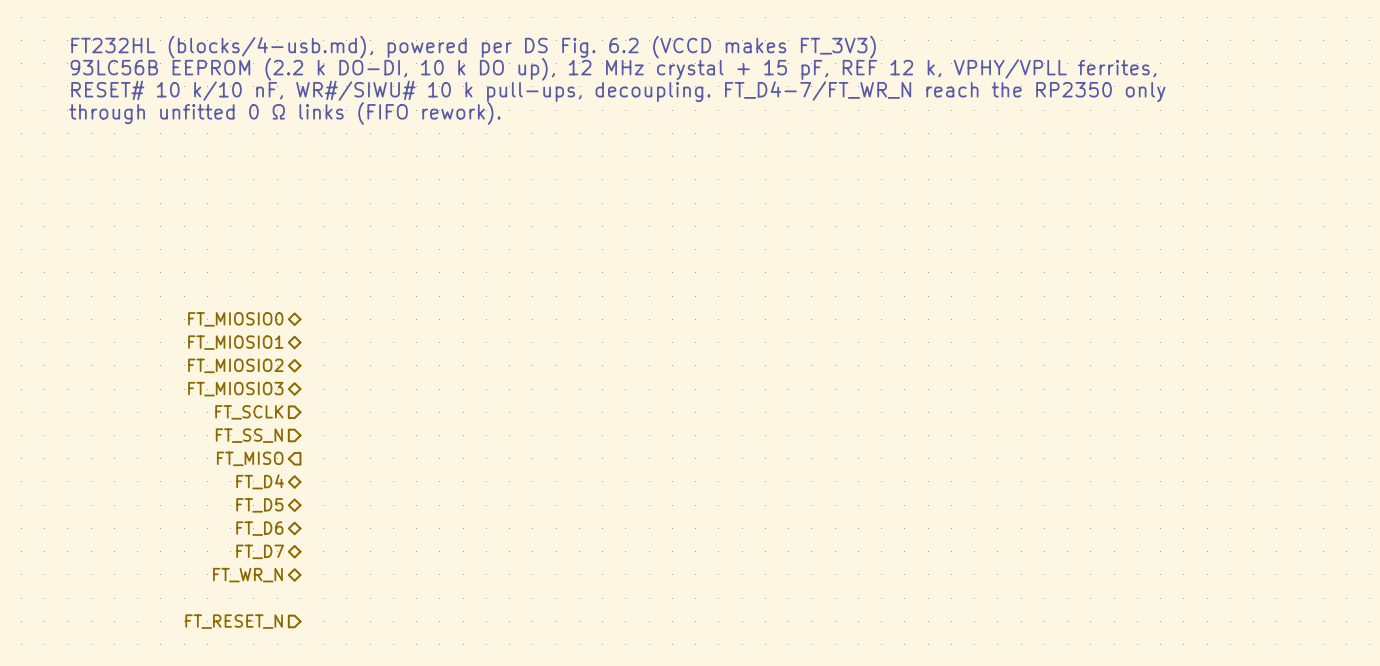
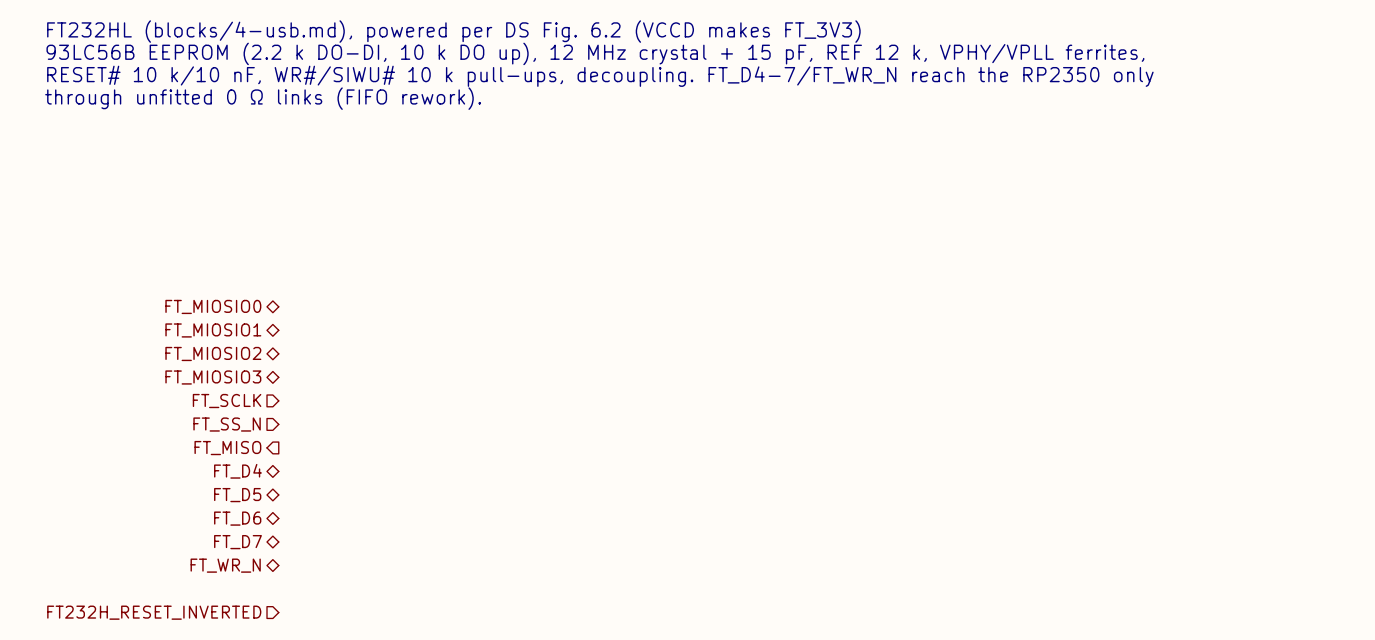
hierarchical label: FT_RESET_N (234, 621) -> FT232H_RESET_INVERTED (154, 612)

